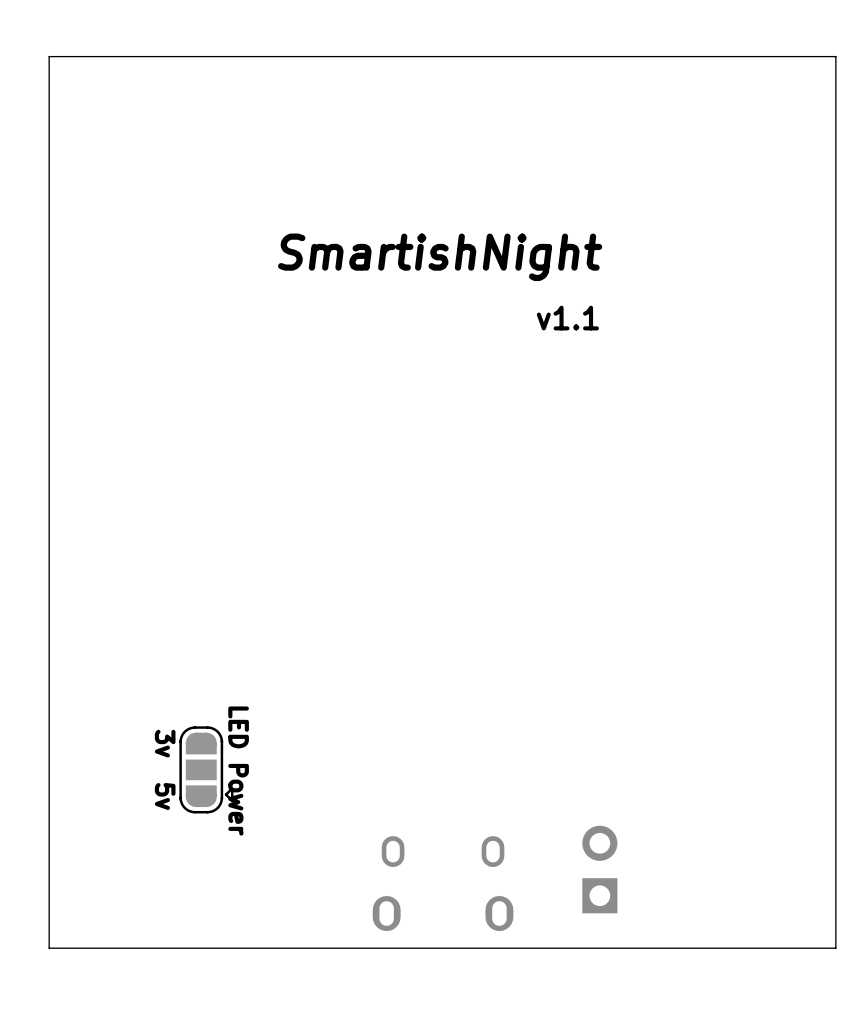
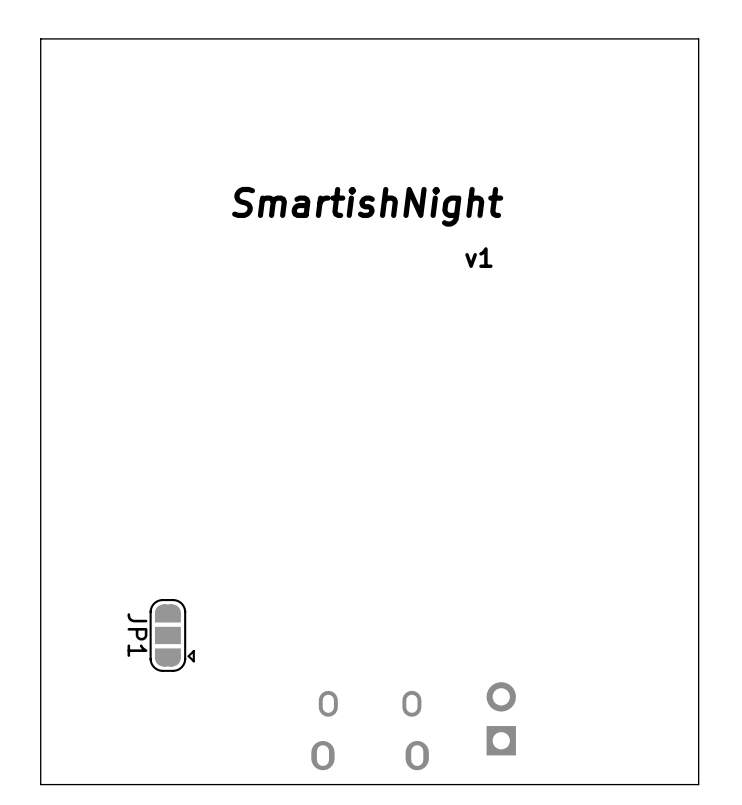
text: v1.1 (567, 318) -> v1 (478, 257)
text: 3v (165, 743) -> none
JP1 name: none -> JP1 (137, 635)
text: LED Power (238, 771) -> none
text: 5v (165, 796) -> none

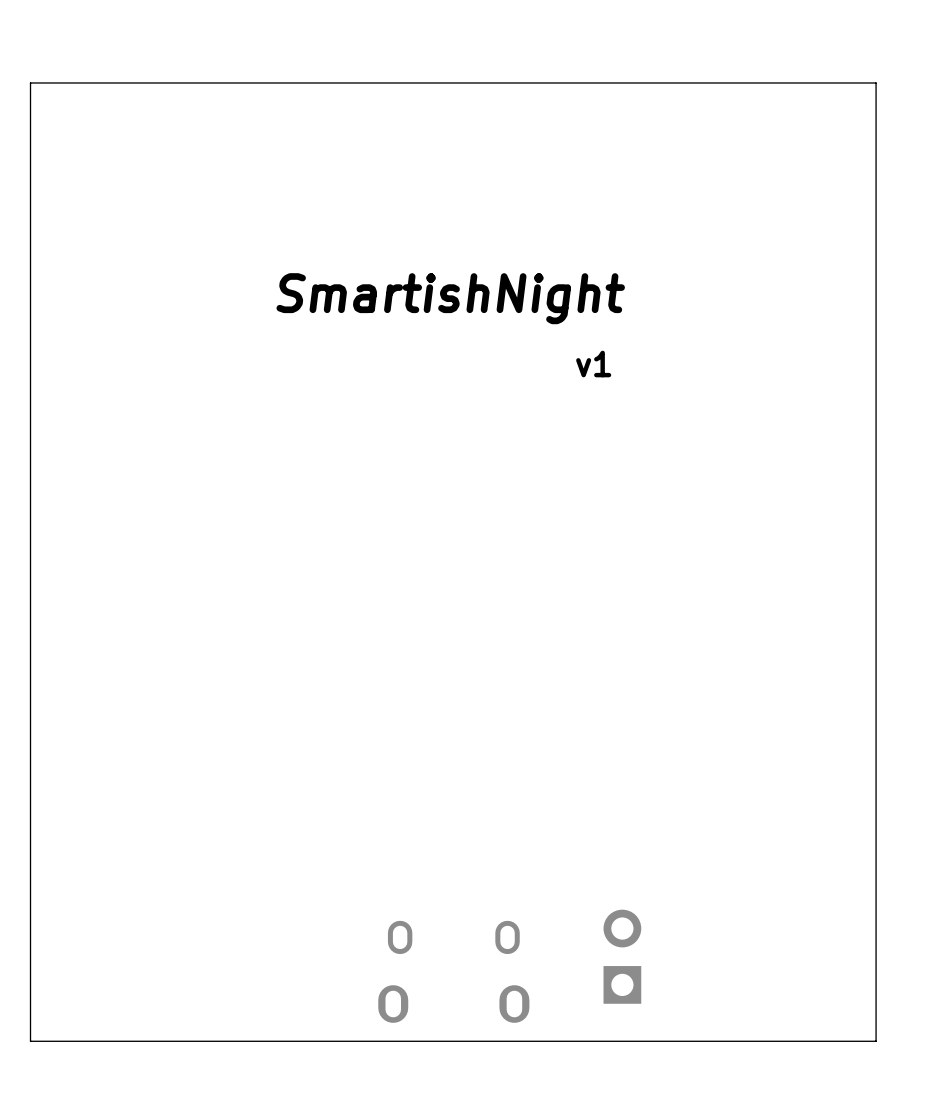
JP1: (172, 635) -> none

